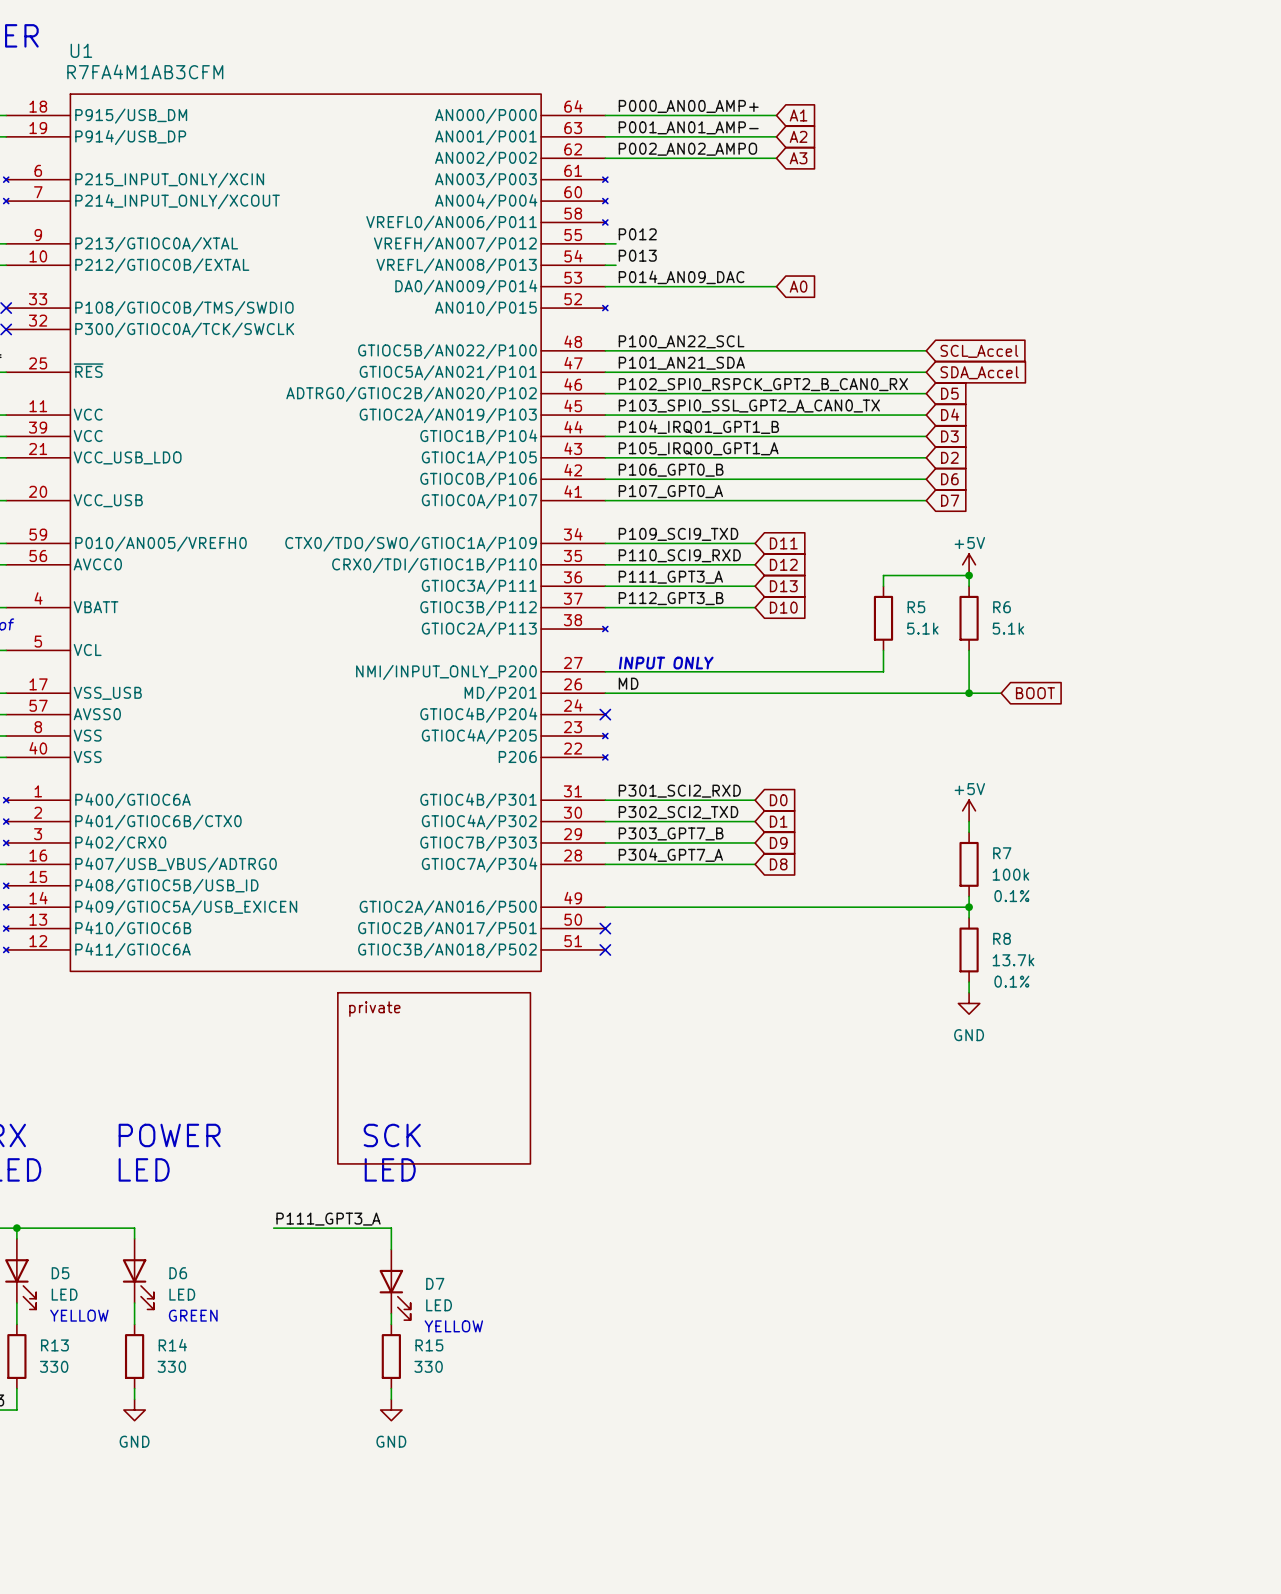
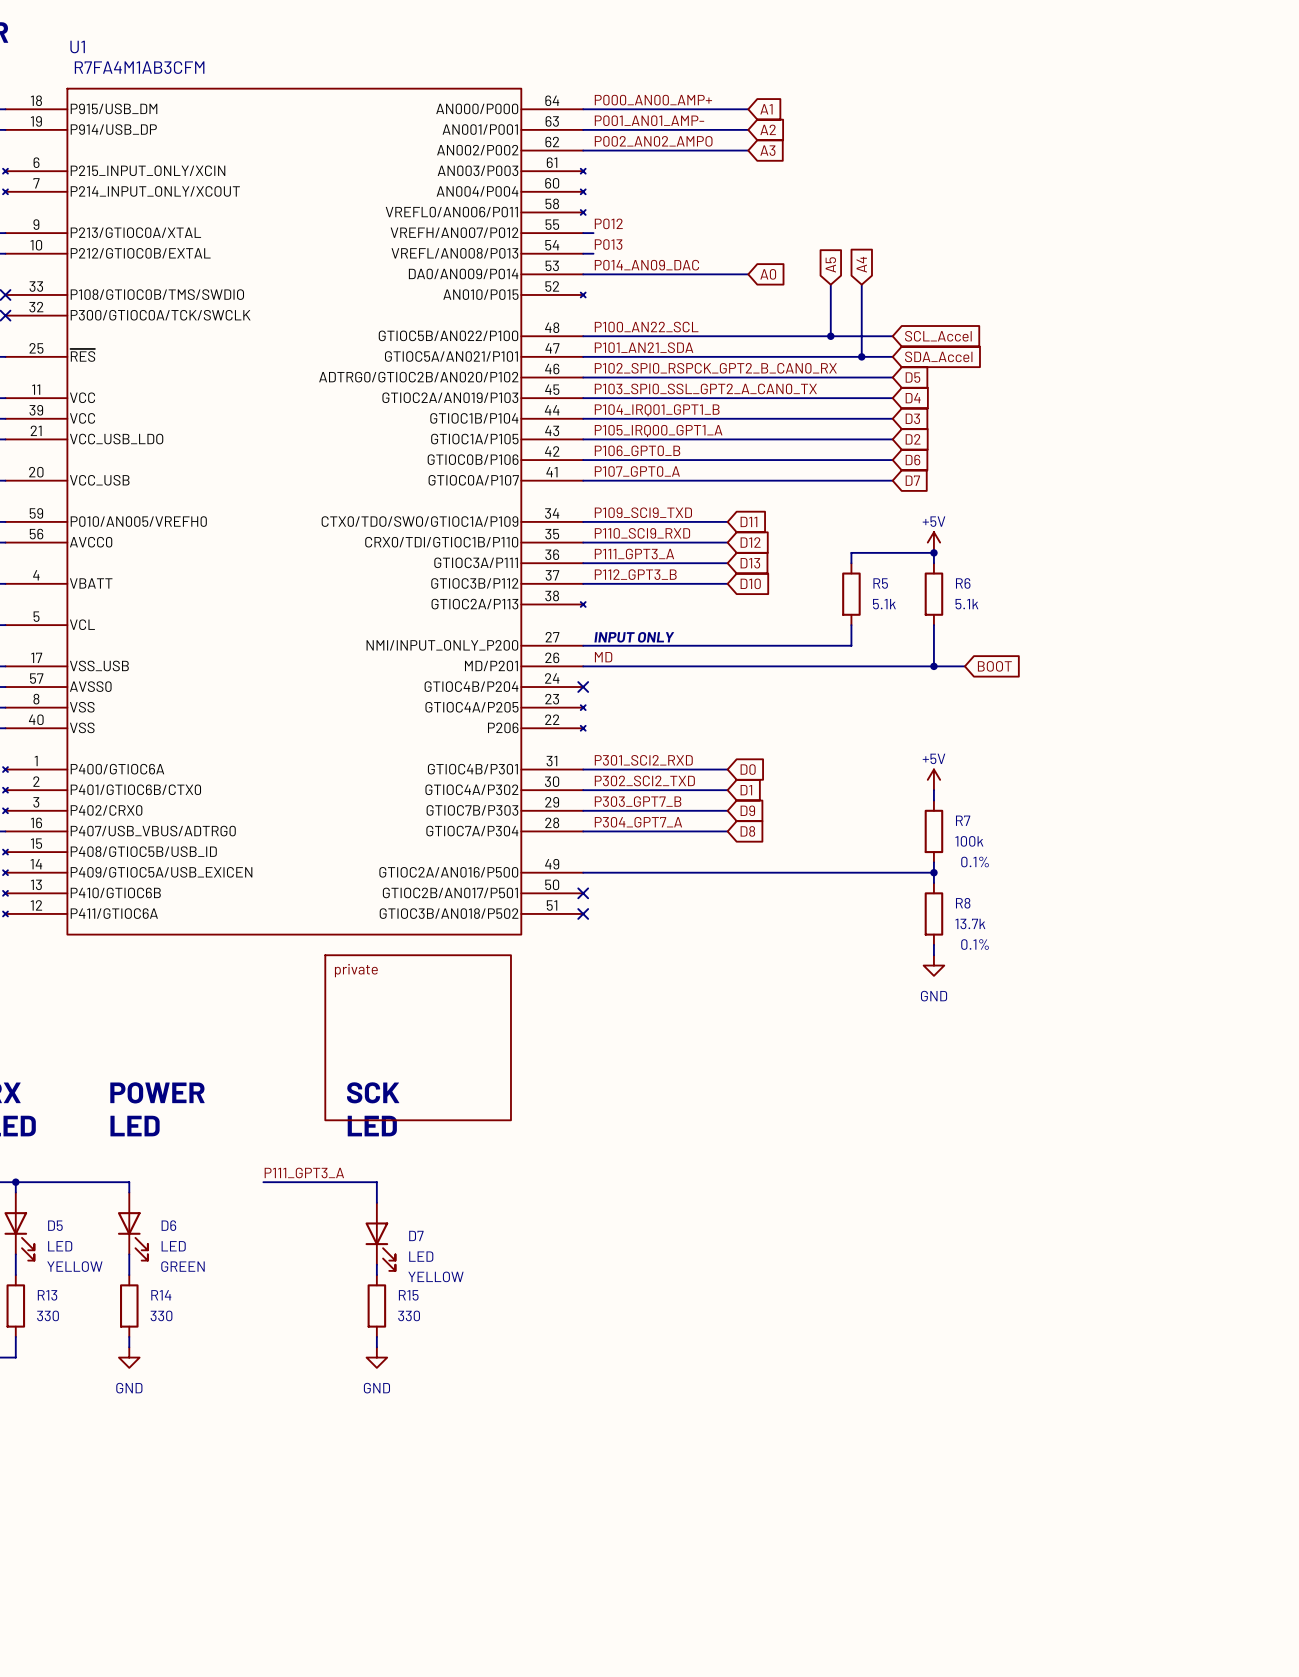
global label: none -> A5 (830, 264)
global label: none -> A4 (861, 264)
wire: none -> (830, 284) (830, 336)
wire: none -> (861, 284) (861, 356)
junction: none -> (830, 336)
junction: none -> (861, 356)

